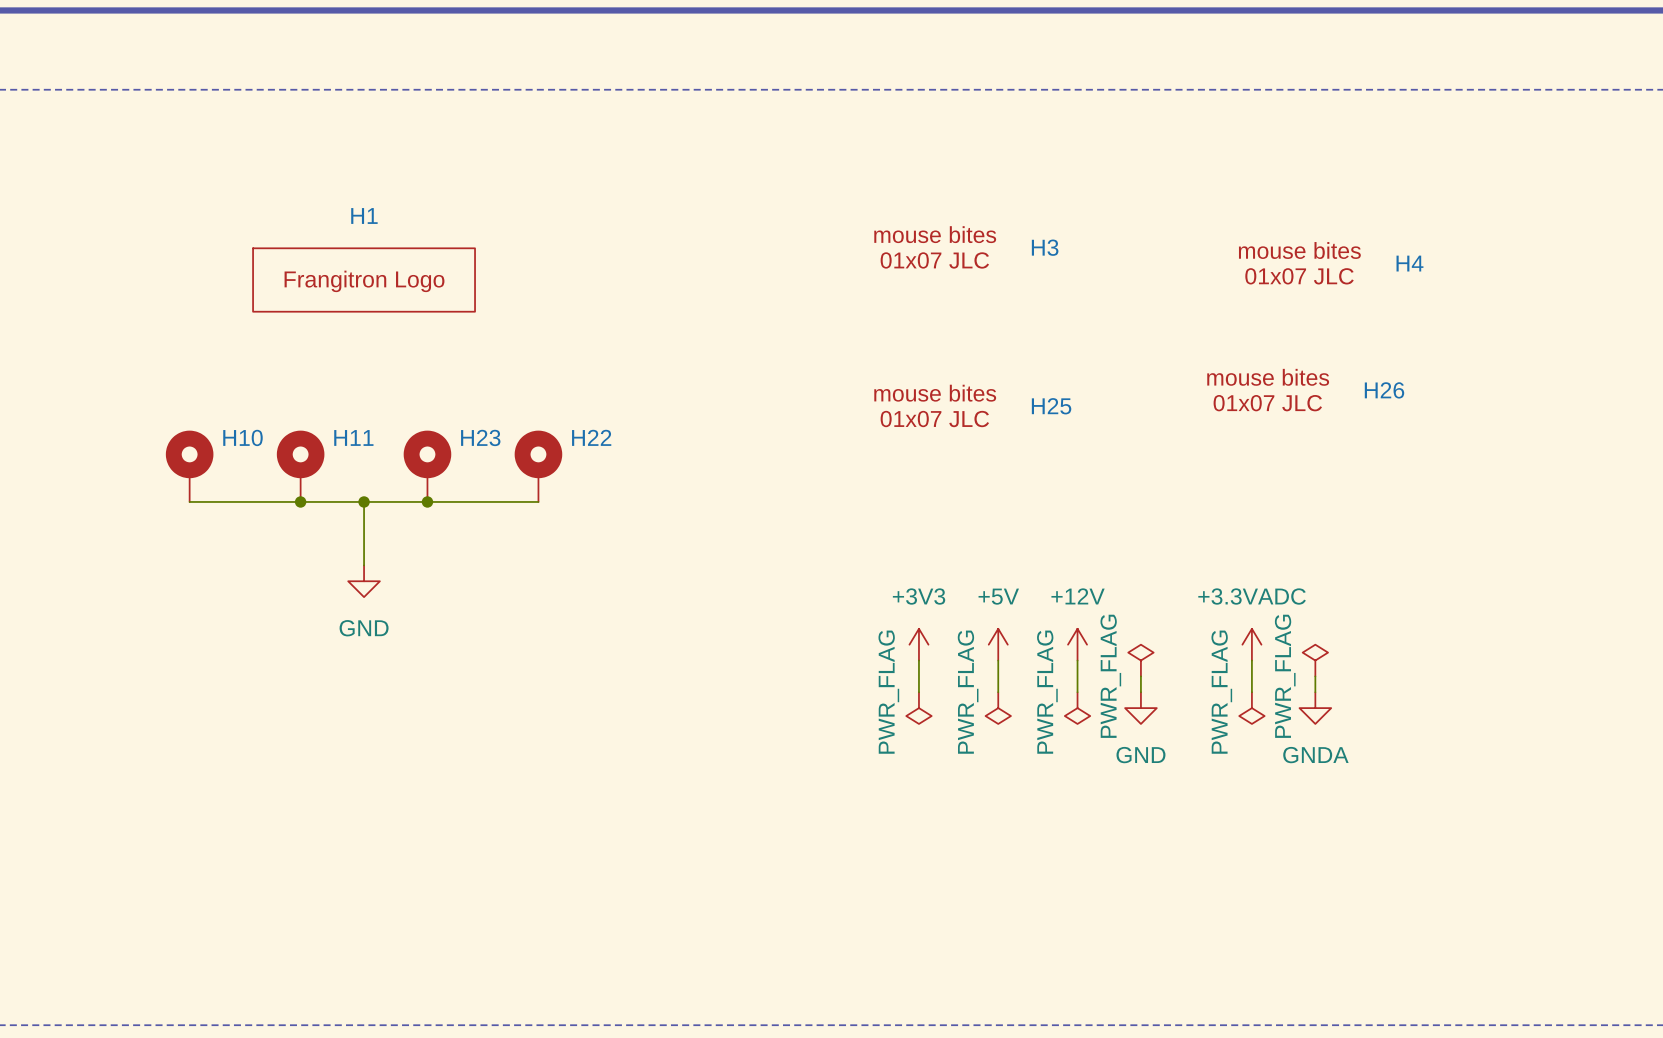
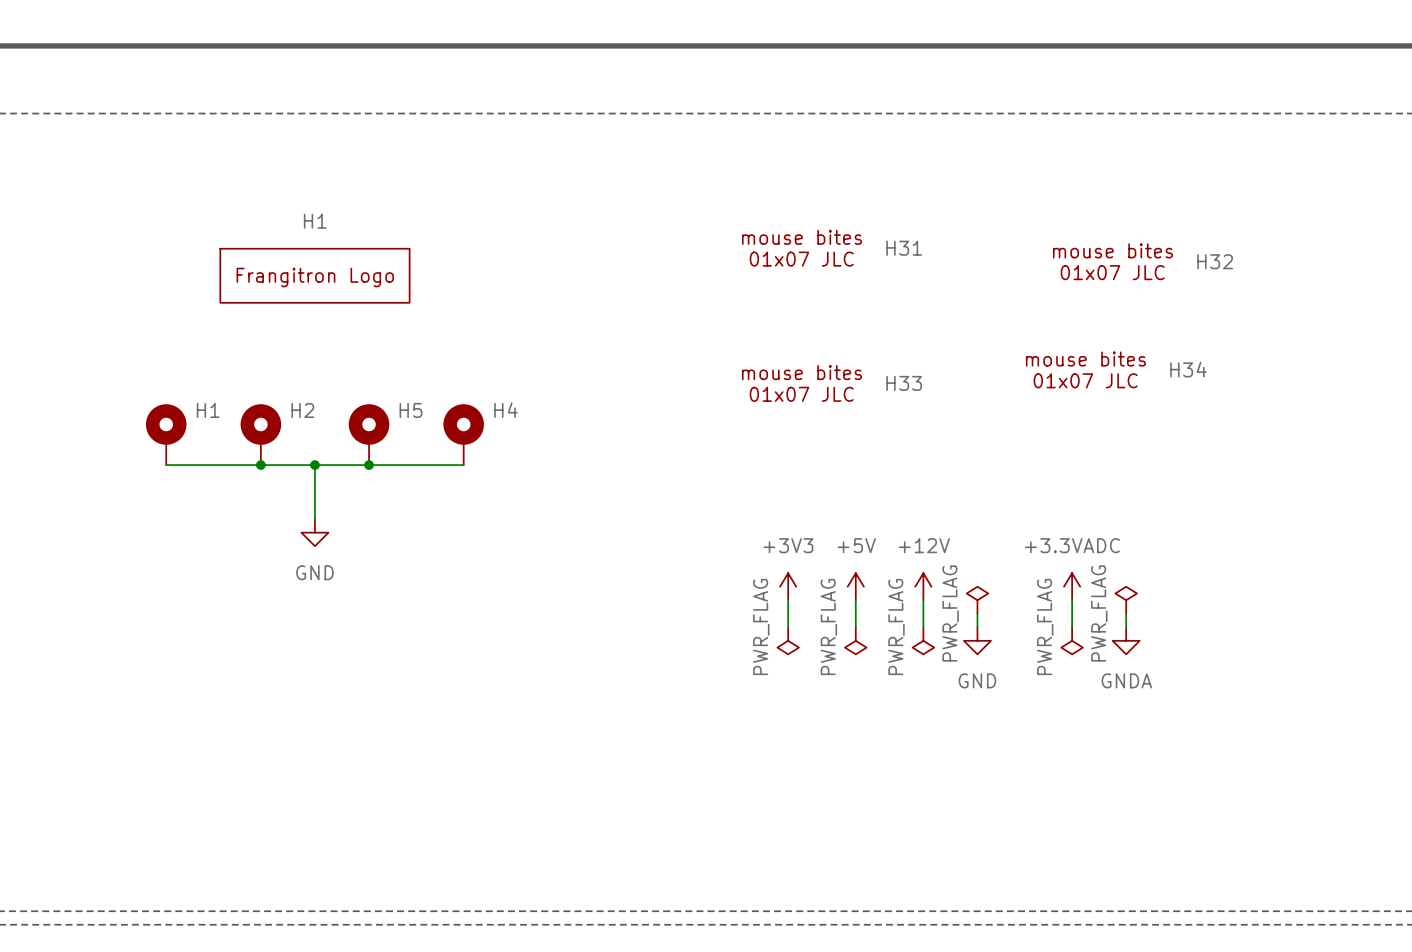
H3 name: H3 (1045, 247) -> H31 (904, 248)
H4 name: H4 (1409, 263) -> H32 (1215, 261)
H26 name: H26 (1384, 390) -> H34 (1188, 369)
H25 name: H25 (1051, 406) -> H33 (904, 383)
H10 name: H10 (242, 437) -> H1 (208, 410)
H11 name: H11 (353, 437) -> H2 (302, 410)
H23 name: H23 (480, 437) -> H5 (410, 410)
H22 name: H22 (591, 437) -> H4 (505, 410)

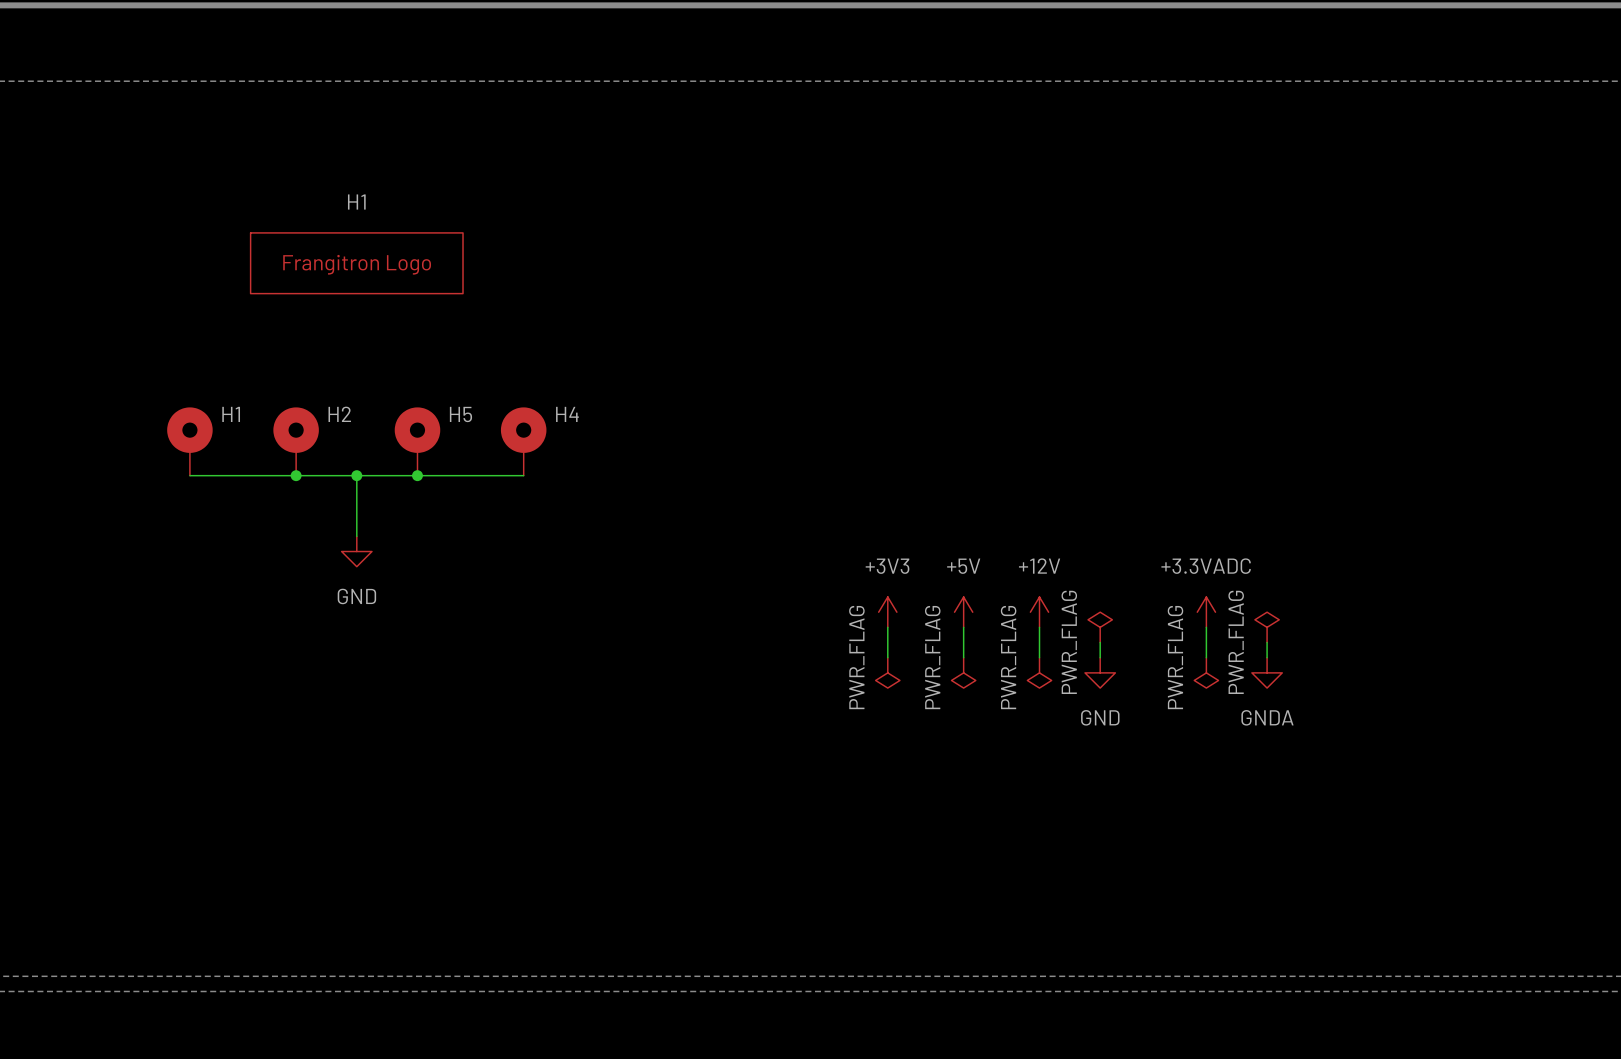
H31: (832, 248) -> none
H32: (1142, 261) -> none
H34: (1116, 369) -> none
H33: (832, 383) -> none

